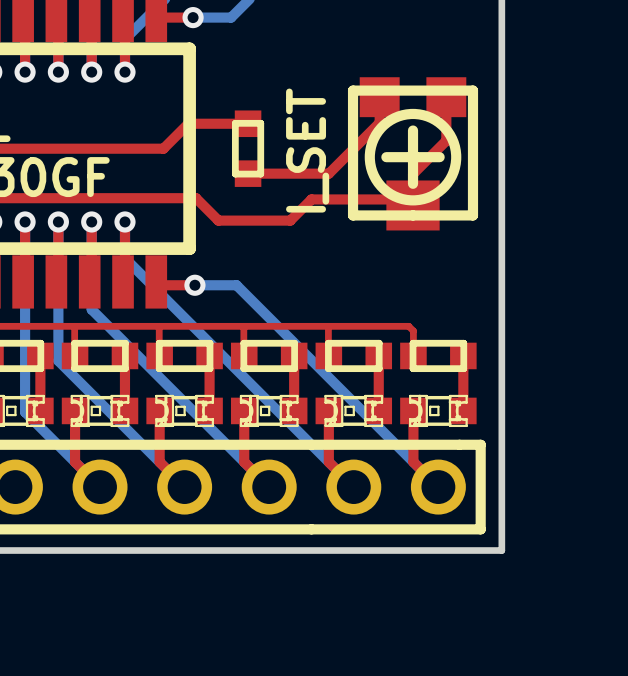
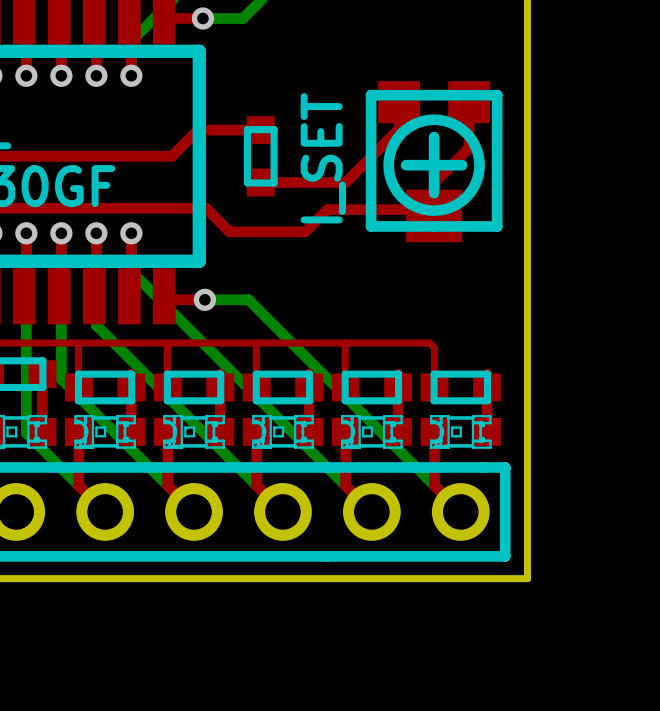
part position: (100, 355) -> (105, 387)
part position: (184, 355) -> (194, 387)
part position: (269, 355) -> (282, 387)
part position: (353, 355) -> (371, 387)
part position: (438, 355) -> (460, 387)

